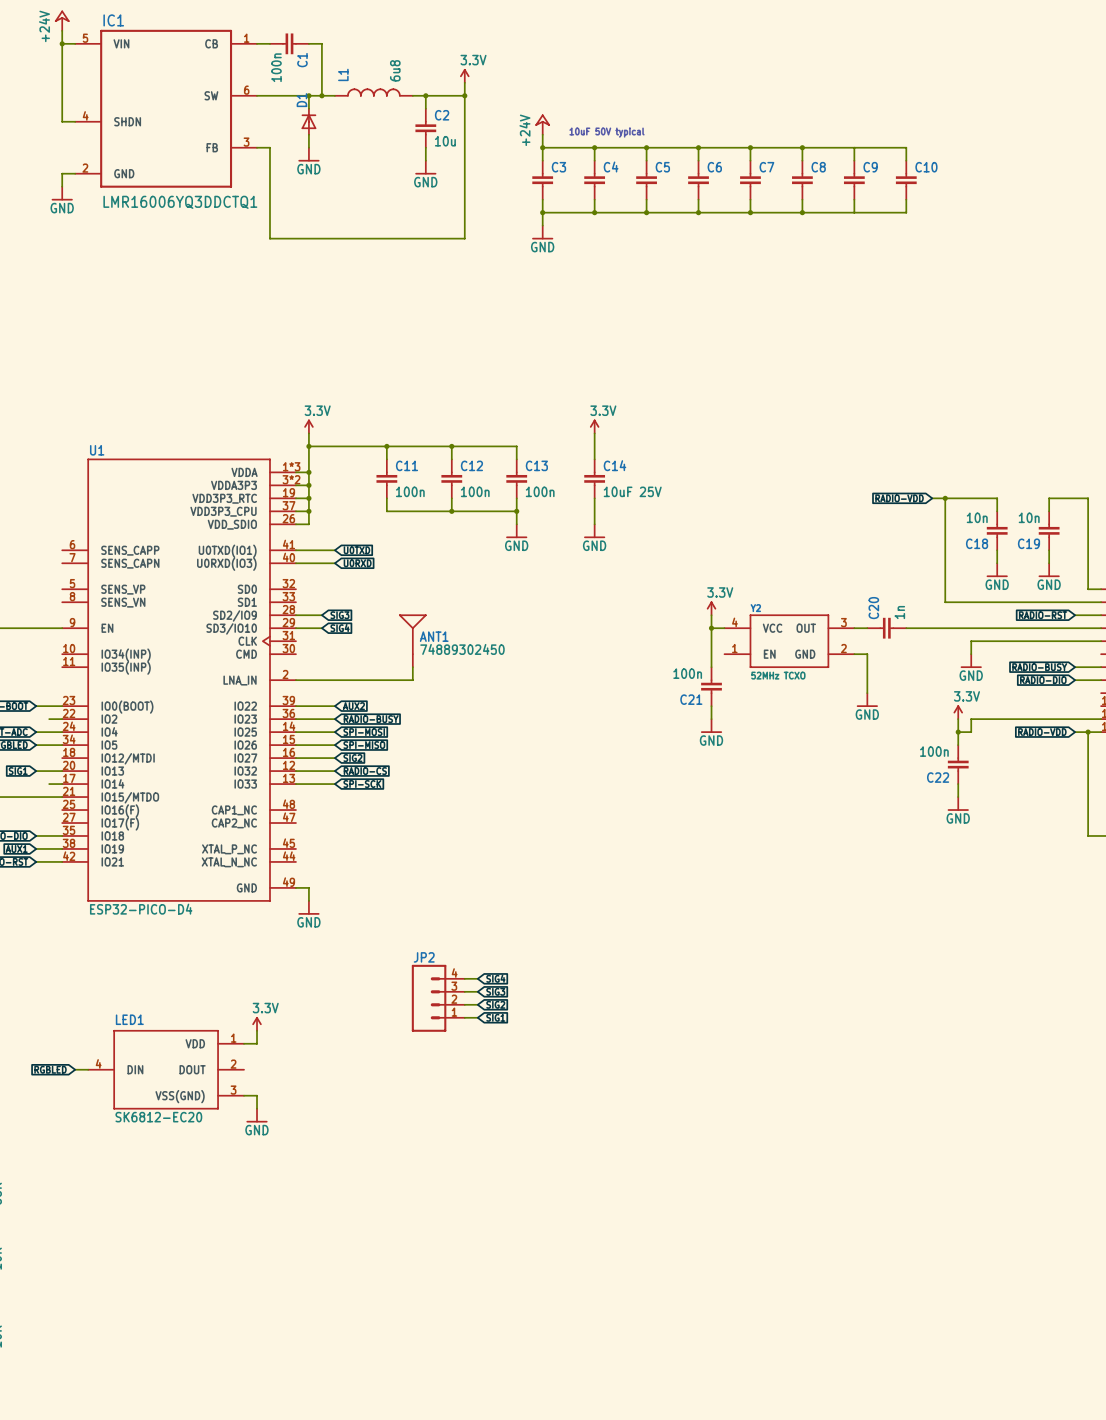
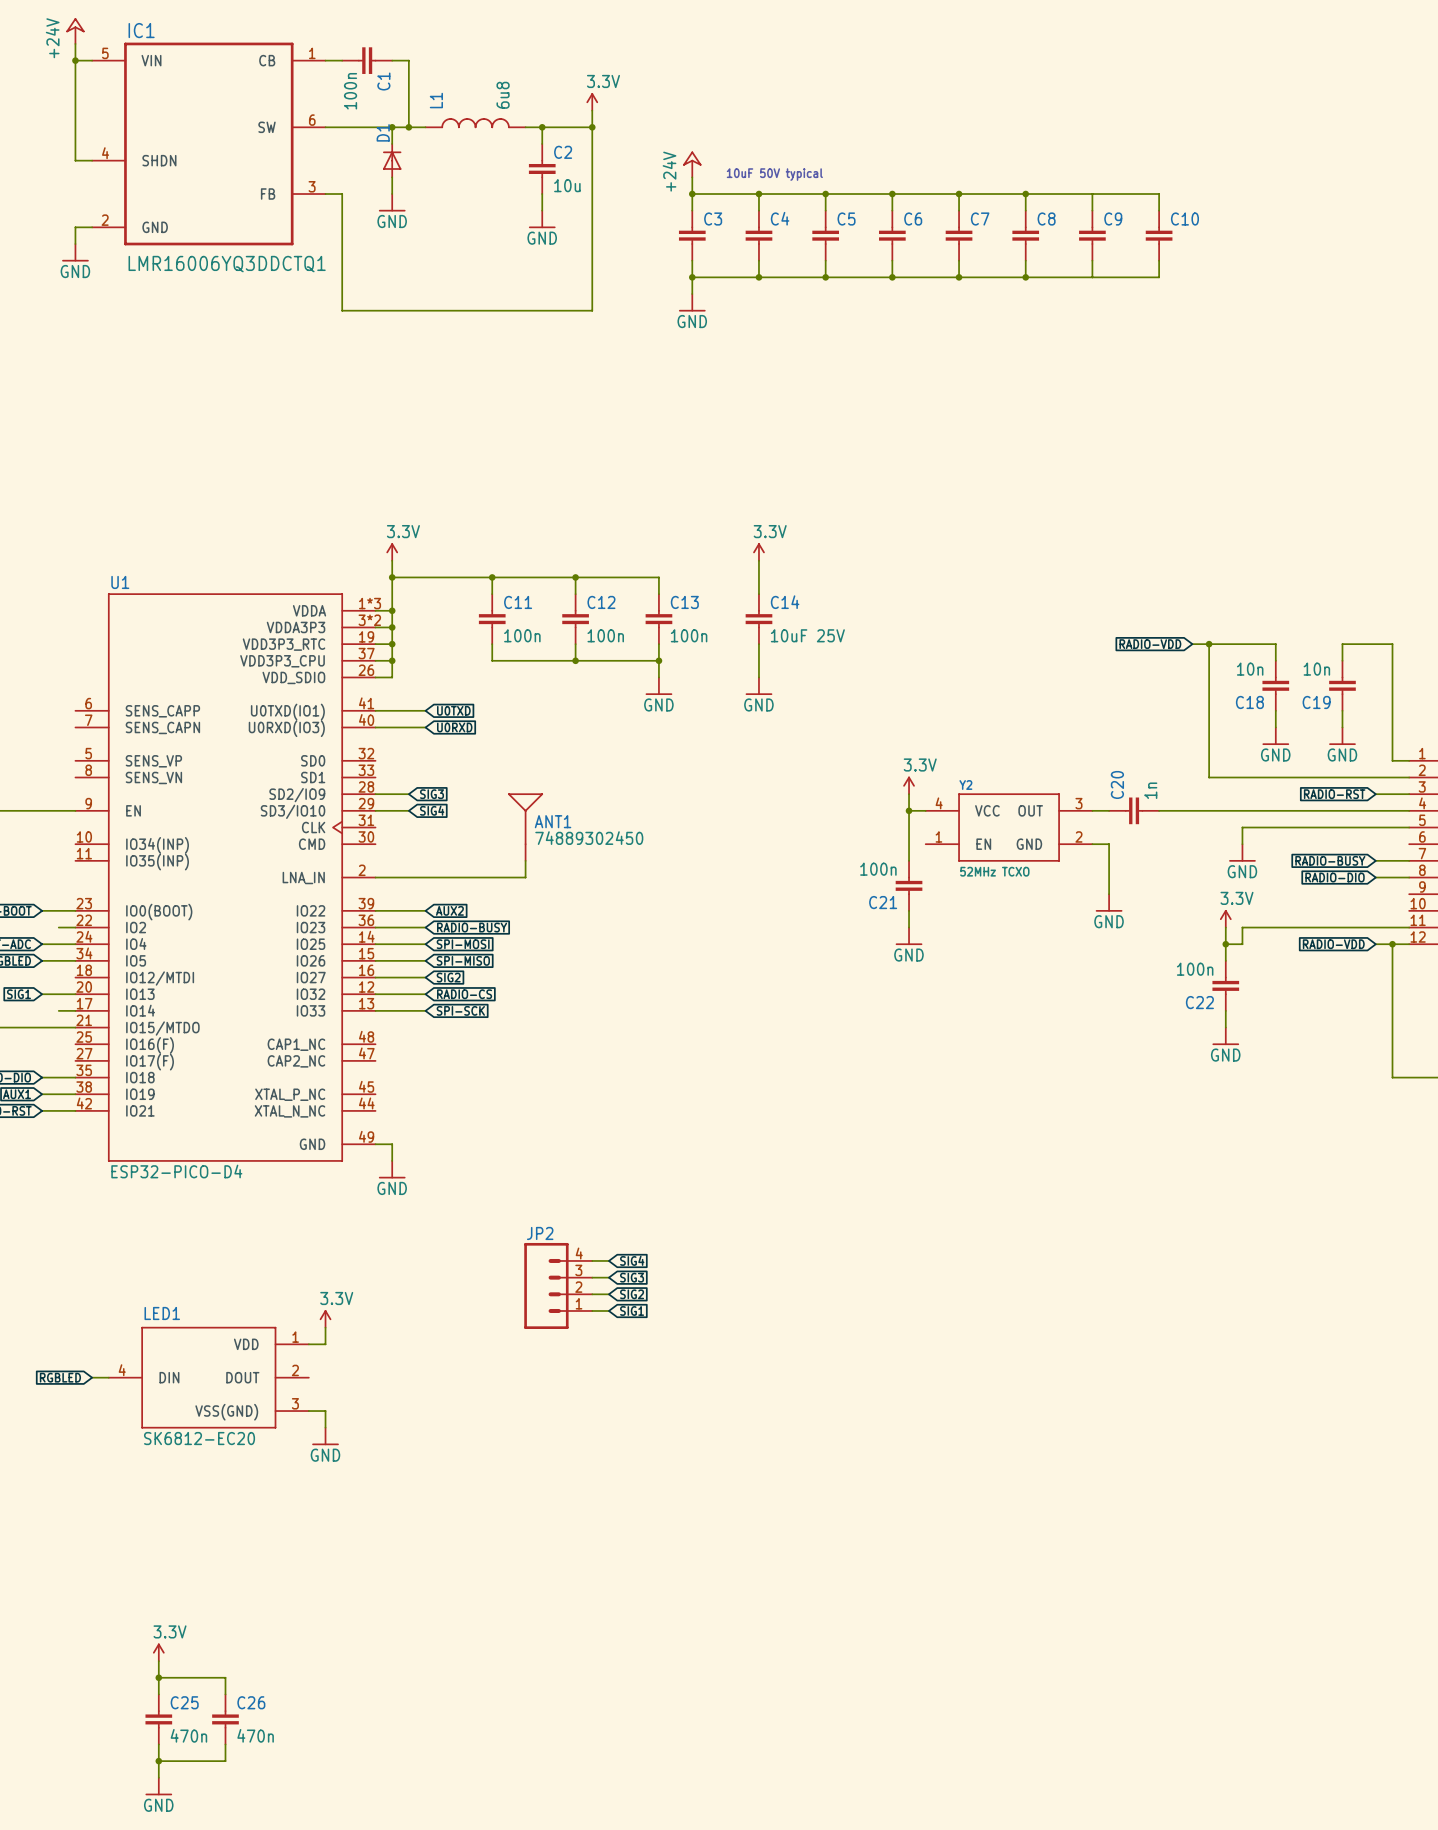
power symbol: none -> 3.3V (158, 1652)
wire: none -> (158, 1661) (158, 1694)
wire: none -> (158, 1677) (225, 1677) (225, 1694)
junction: none -> (158, 1677)
C25: none -> 470n (158, 1719)
C26: none -> 470n (225, 1719)
wire: none -> (158, 1744) (158, 1777)
wire: none -> (225, 1744) (225, 1761) (158, 1761)
junction: none -> (158, 1761)
power symbol: none -> GND (158, 1786)

